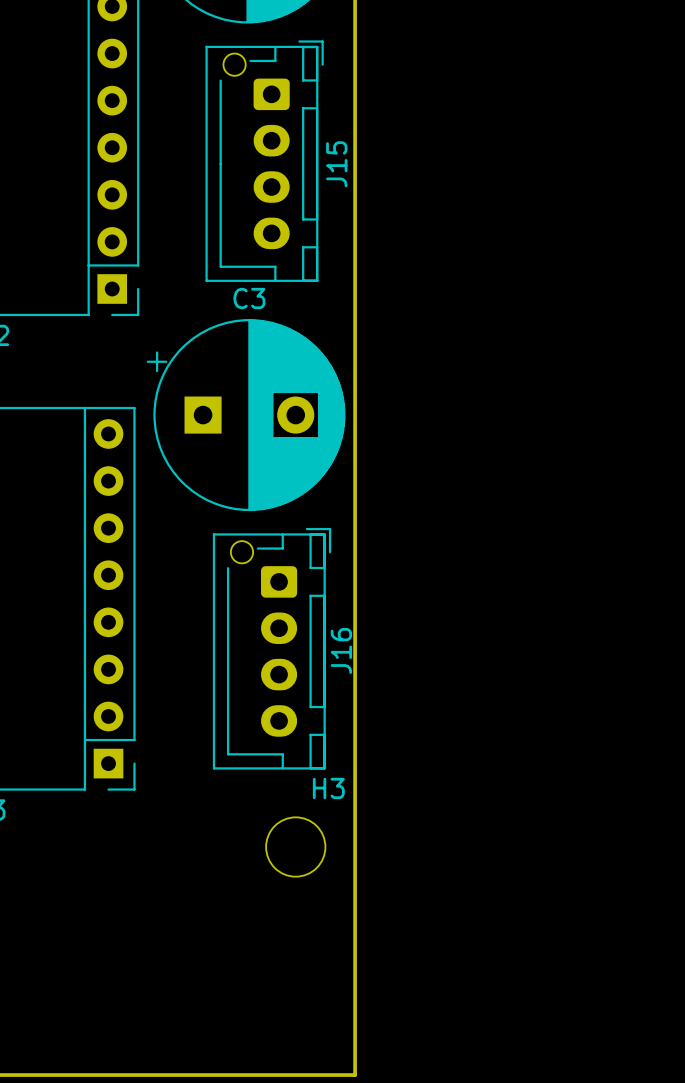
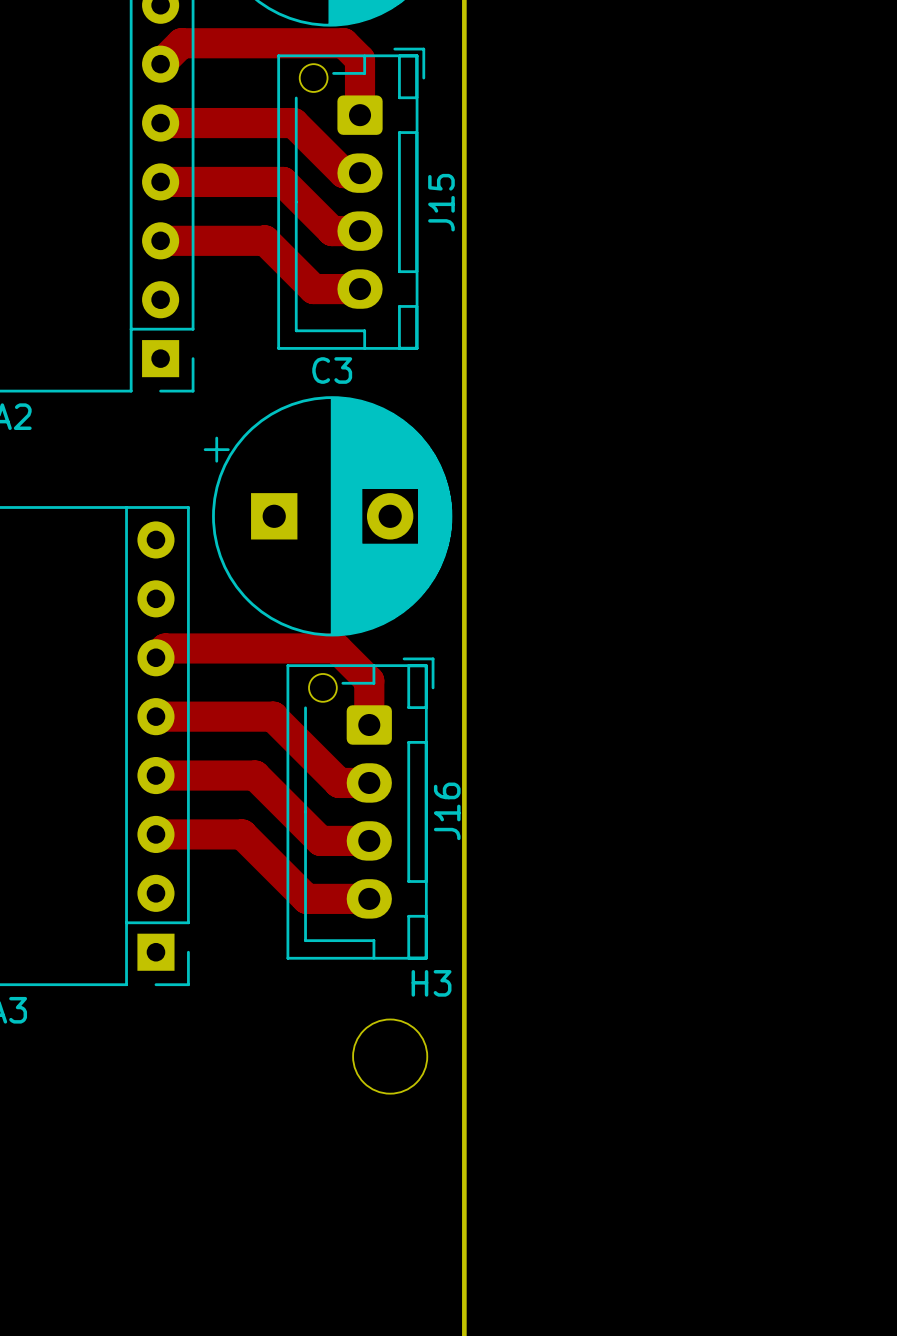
track: none -> (160, 64) (181, 43) (343, 43) (360, 59) (360, 115)
track: none -> (160, 123) (293, 123) (343, 173) (360, 173)
track: none -> (160, 181) (283, 181) (332, 231) (360, 231)
track: none -> (160, 240) (264, 240) (313, 289) (360, 289)
track: none -> (155, 657) (165, 648) (336, 648) (369, 680) (369, 724)
track: none -> (155, 716) (273, 716)
track: none -> (273, 716) (339, 782) (369, 782)
track: none -> (155, 775) (255, 775) (320, 840) (369, 840)
track: none -> (155, 834) (242, 834) (306, 898) (369, 898)

